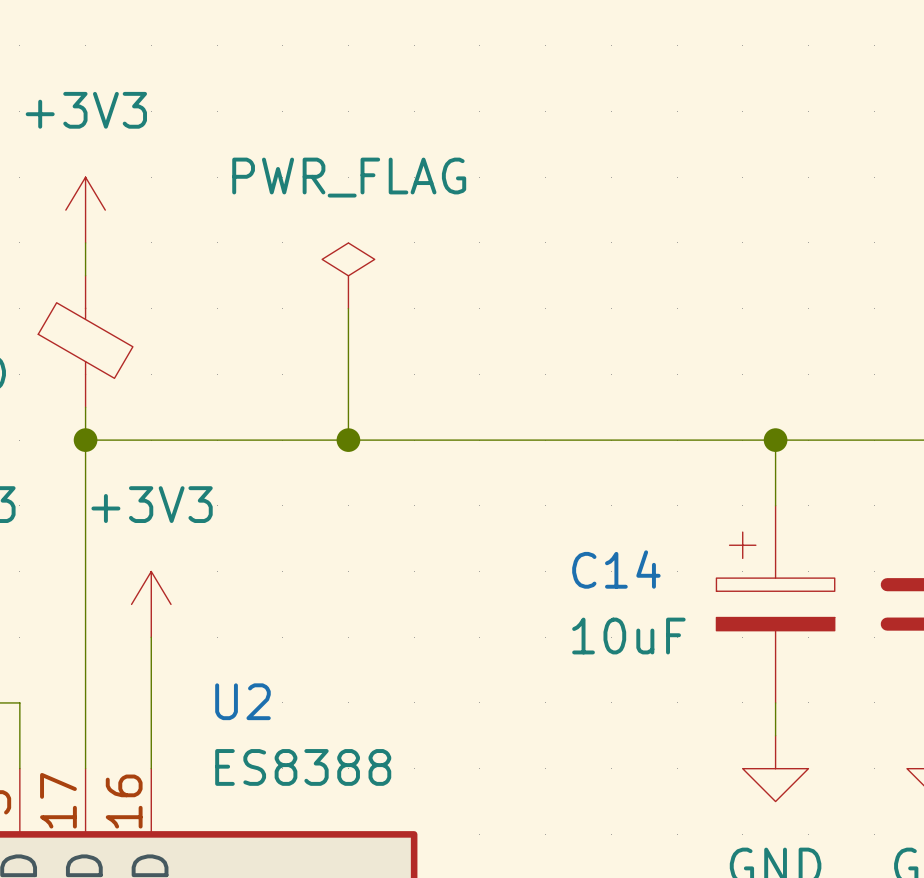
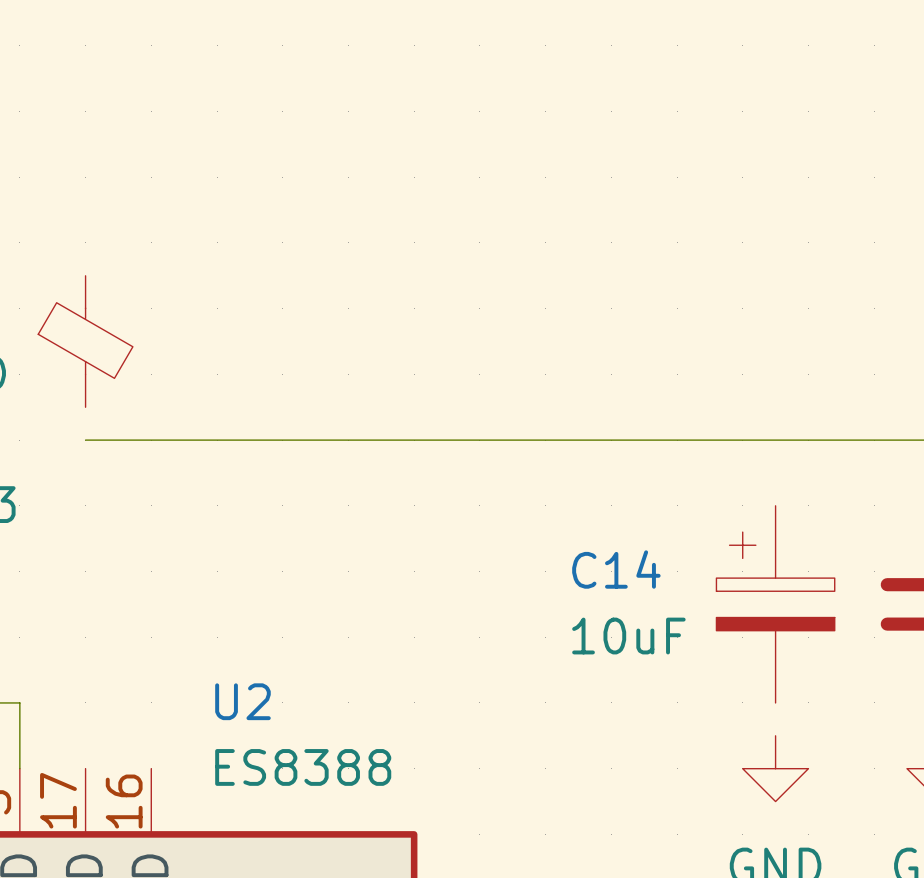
power symbol: +3V3 (85, 210) -> none
wire: (85, 242) (85, 275) -> none
power symbol: PWR_FLAG (348, 275) -> none
wire: (348, 308) (348, 440) -> none
wire: (85, 407) (85, 768) -> none
junction: (85, 440) -> none
junction: (348, 440) -> none
wire: (775, 440) (775, 505) -> none
junction: (775, 440) -> none
power symbol: +3V3 (151, 604) -> none
wire: (151, 637) (151, 768) -> none
wire: (775, 702) (775, 735) -> none

